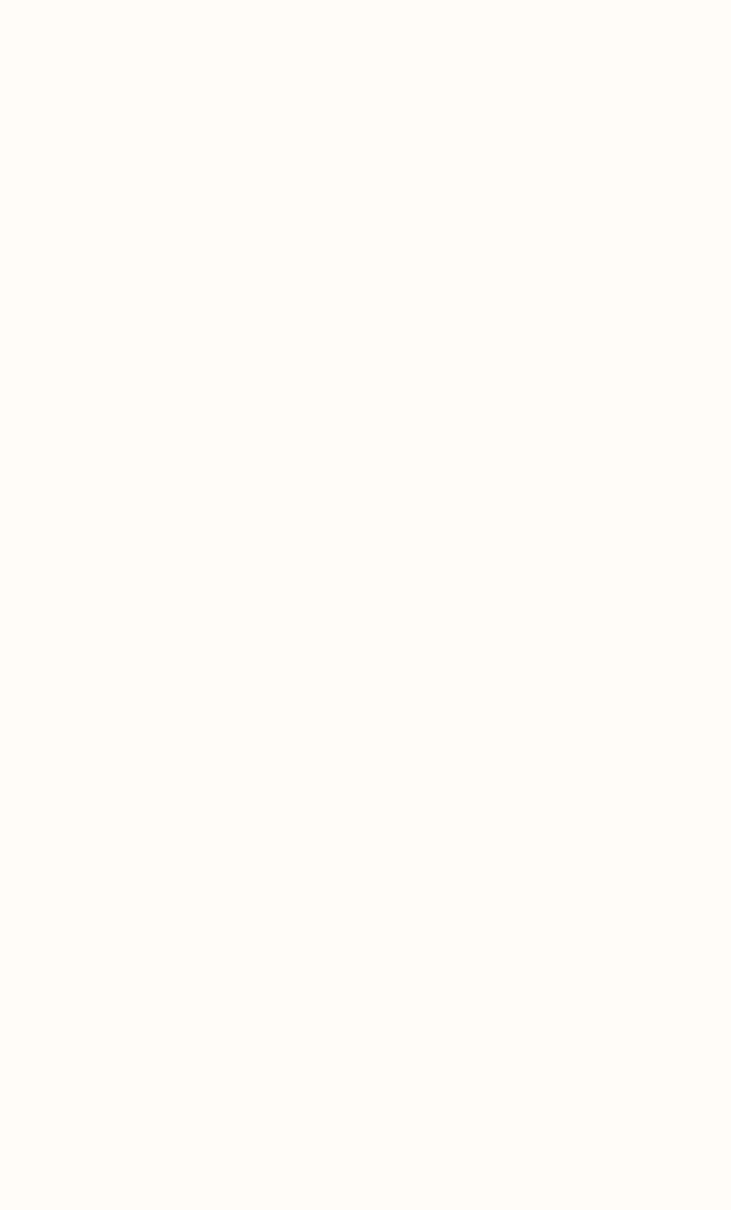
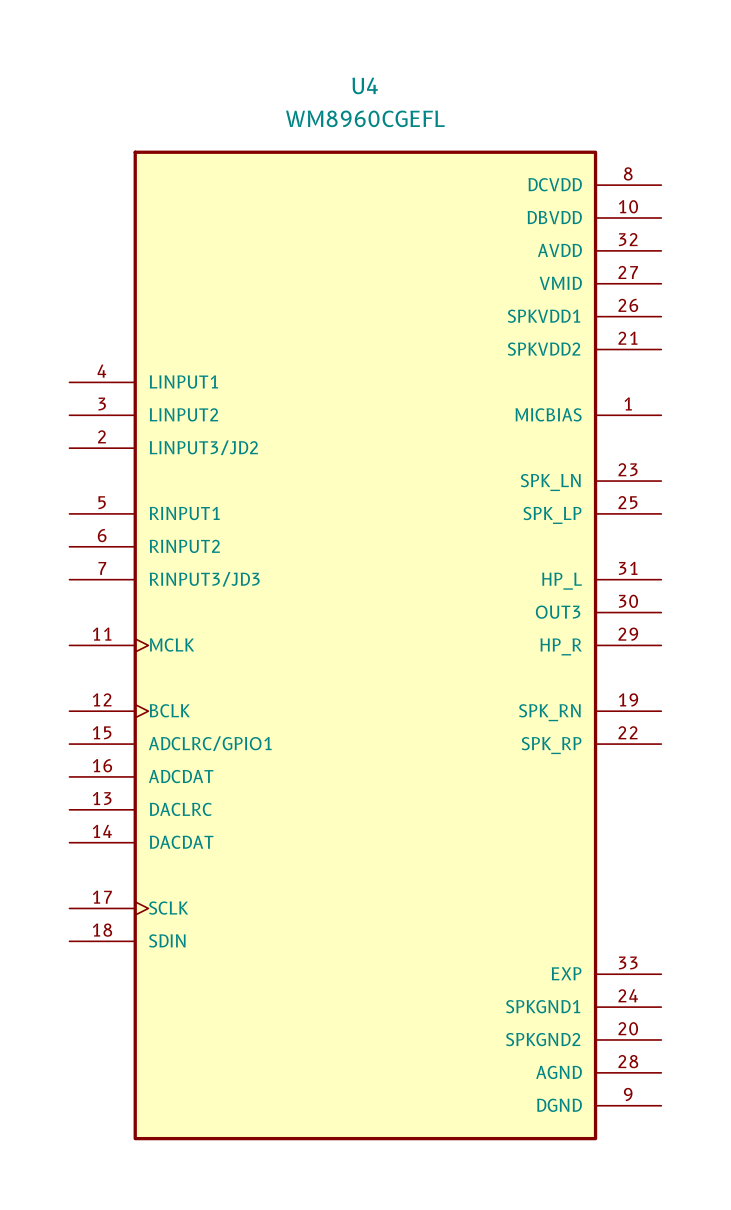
U4: none -> WM8960CGEFL (365, 645)

